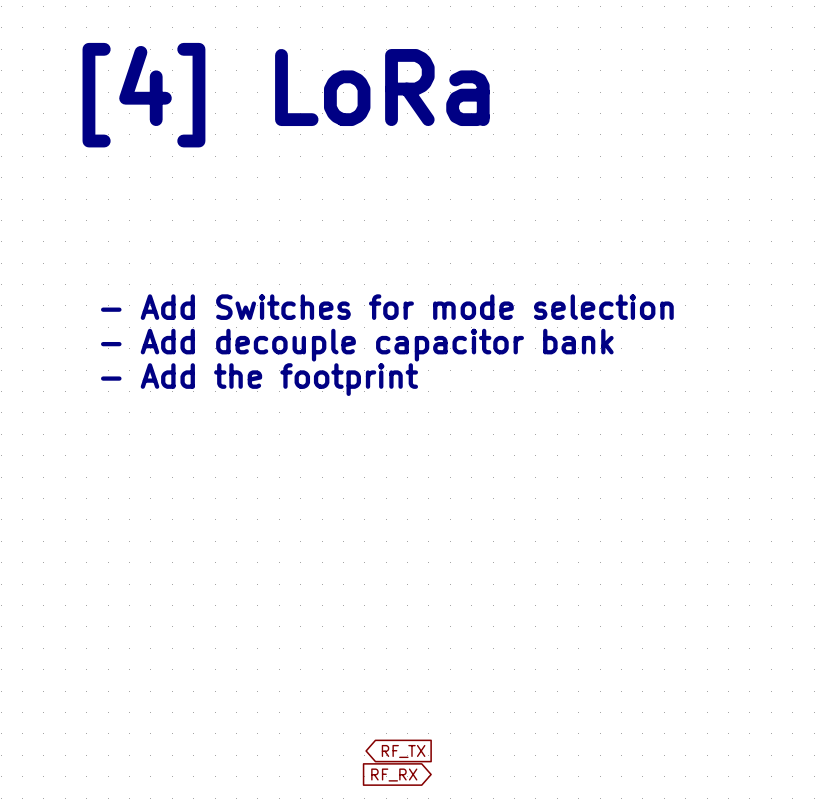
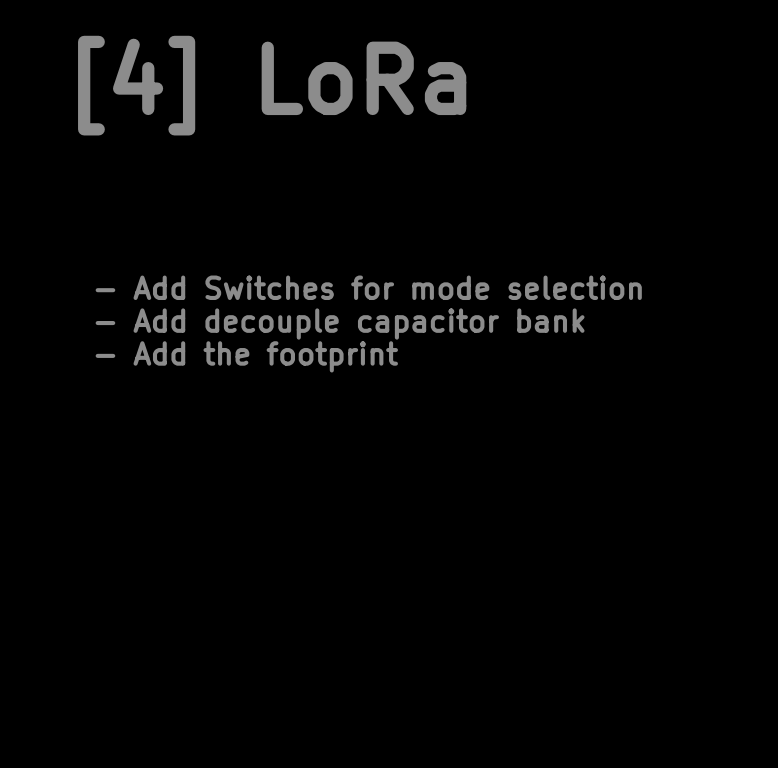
global label: RF_TX (403, 751) -> none
global label: RF_RX (394, 775) -> none

